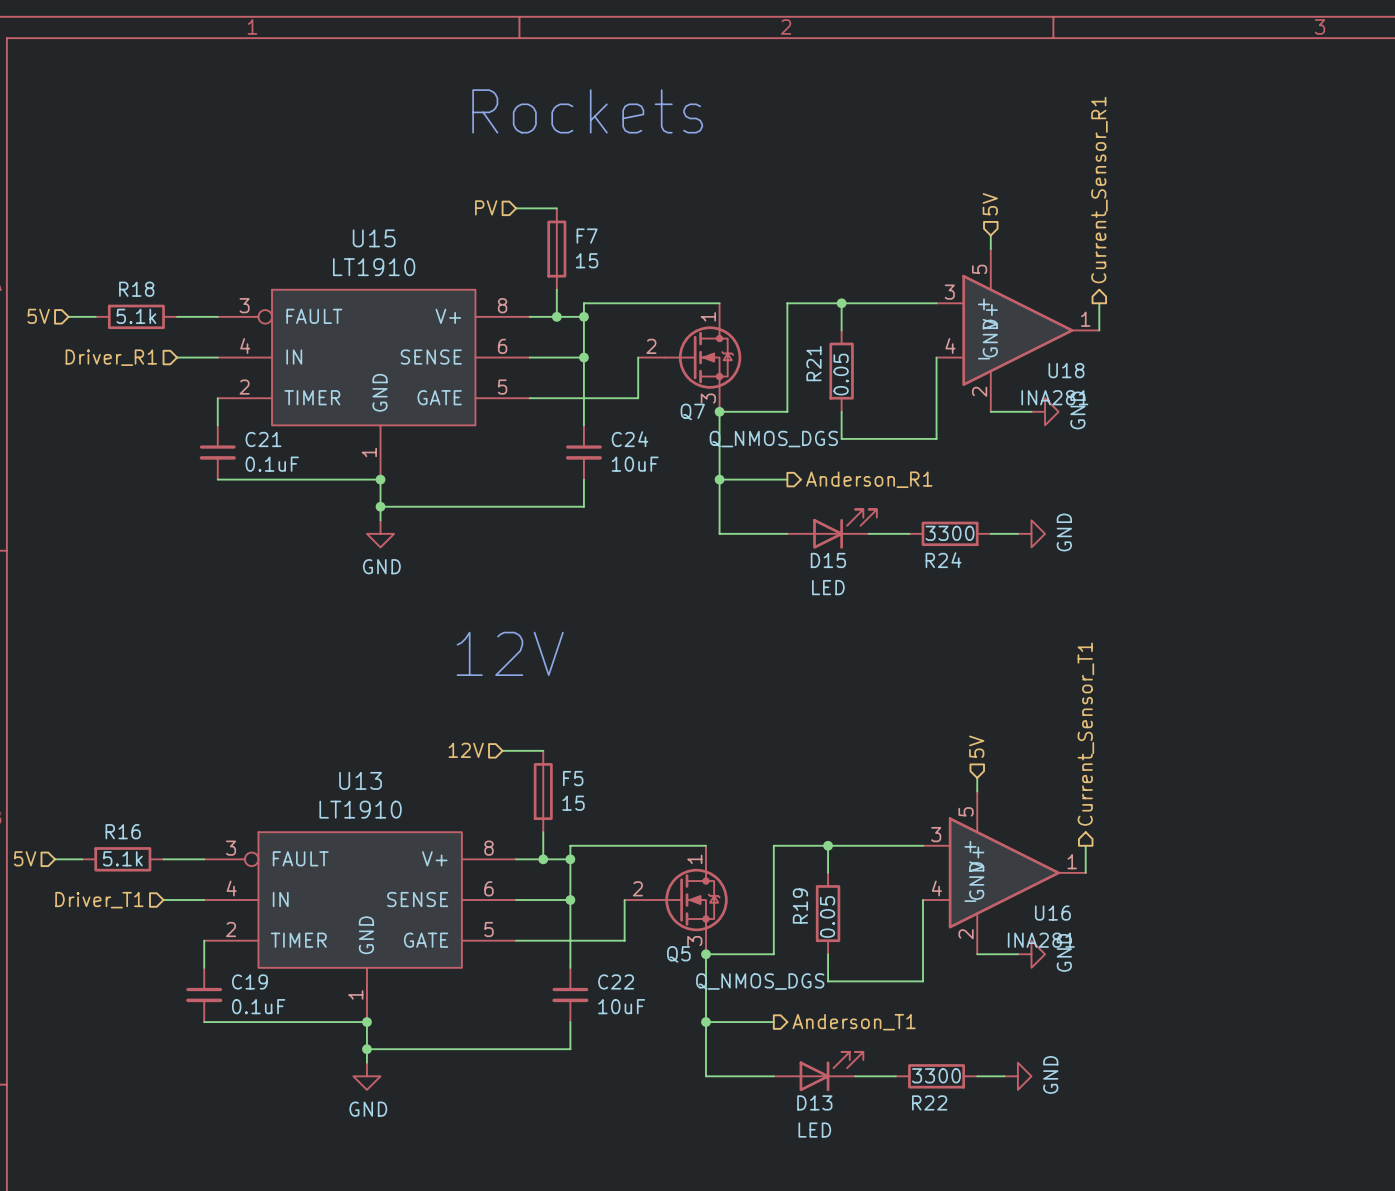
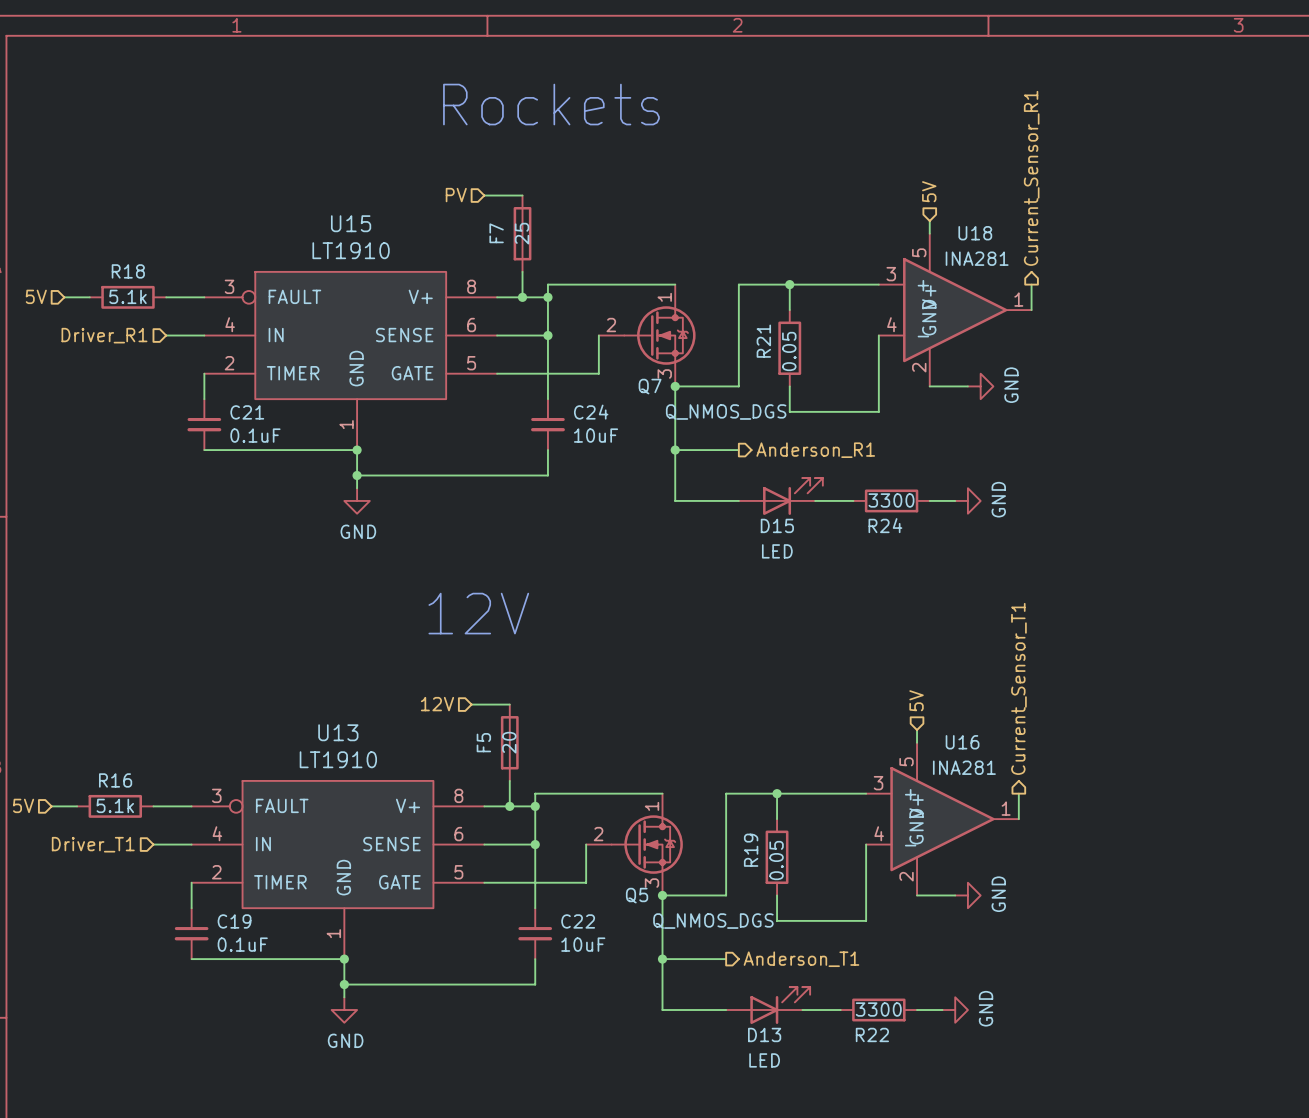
F7 name rotation: 0° (587, 236) -> 90° counterclockwise (496, 233)
F7 name position: F7 (587, 236) -> F7 (496, 233)
F7 value: 15 (587, 260) -> 25 (522, 233)
U18 name position: U18 (1066, 370) -> U18 (975, 233)
U18 value position: INA281 (1054, 397) -> INA281 (977, 258)
F5 name rotation: 0° (573, 778) -> 90° counterclockwise (483, 742)
F5 name position: F5 (573, 778) -> F5 (483, 742)
F5 value: 15 (573, 803) -> 20 (509, 742)
U16 name position: U16 (1052, 913) -> U16 (962, 742)
U16 value position: INA281 (1041, 940) -> INA281 (964, 767)

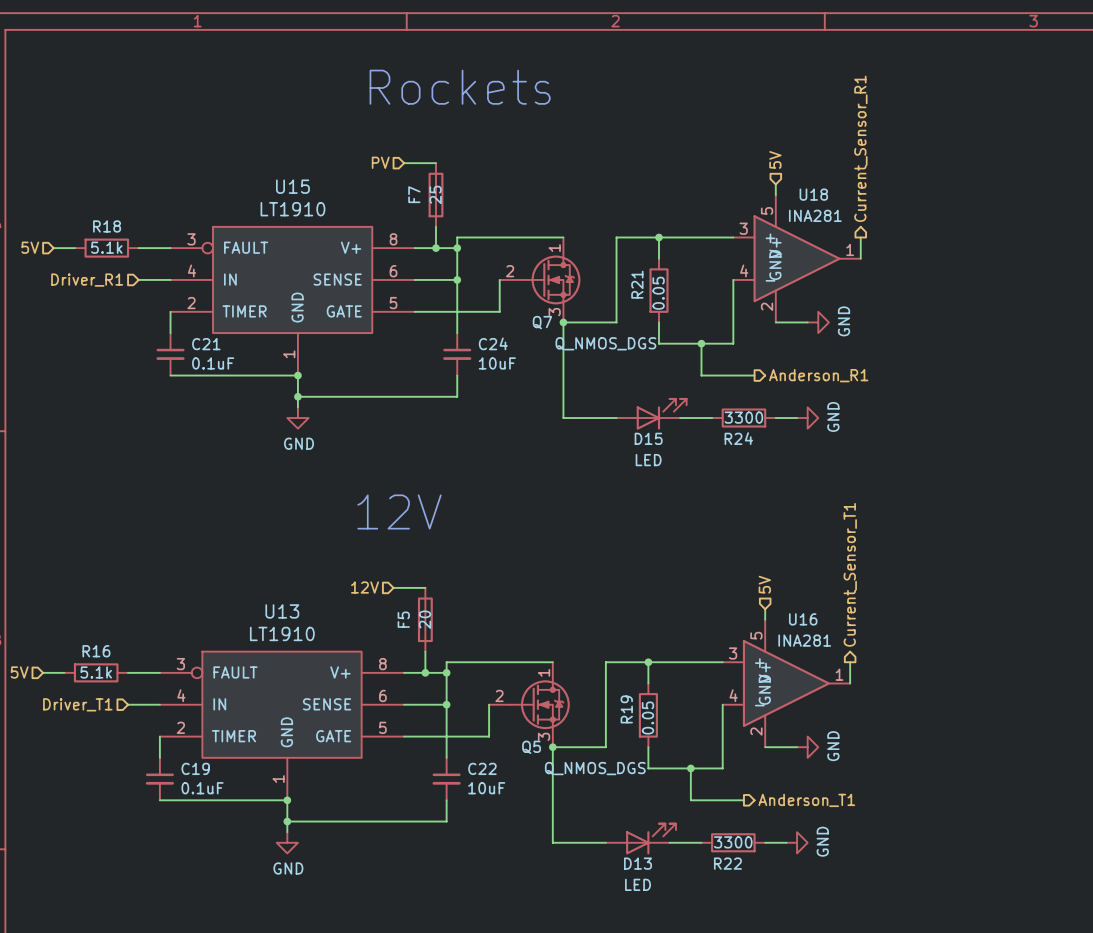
wire: none -> (701, 343) (701, 375) (754, 375)
junction: none -> (701, 343)
wire: (675, 450) (738, 450) -> none
junction: (675, 450) -> none
hierarchical label position: Anderson_R1 (815, 450) -> Anderson_R1 (818, 375)
wire: none -> (690, 768) (690, 800) (743, 800)
junction: none -> (690, 768)
wire: (662, 959) (726, 959) -> none
junction: (662, 959) -> none
hierarchical label position: Anderson_T1 (801, 959) -> Anderson_T1 (806, 800)

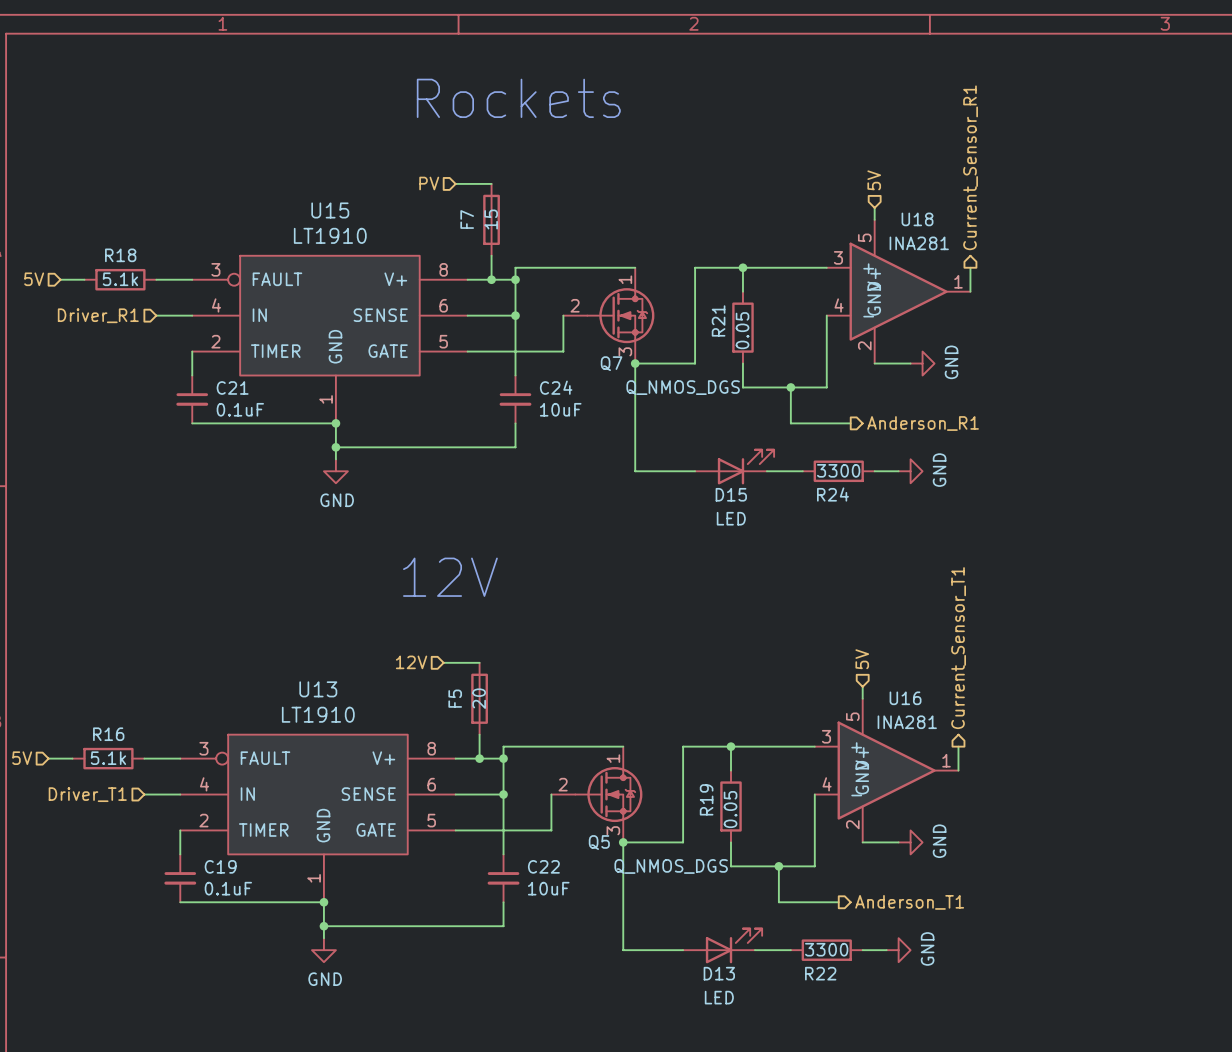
F7 value: 25 (435, 194) -> 15 (491, 219)

